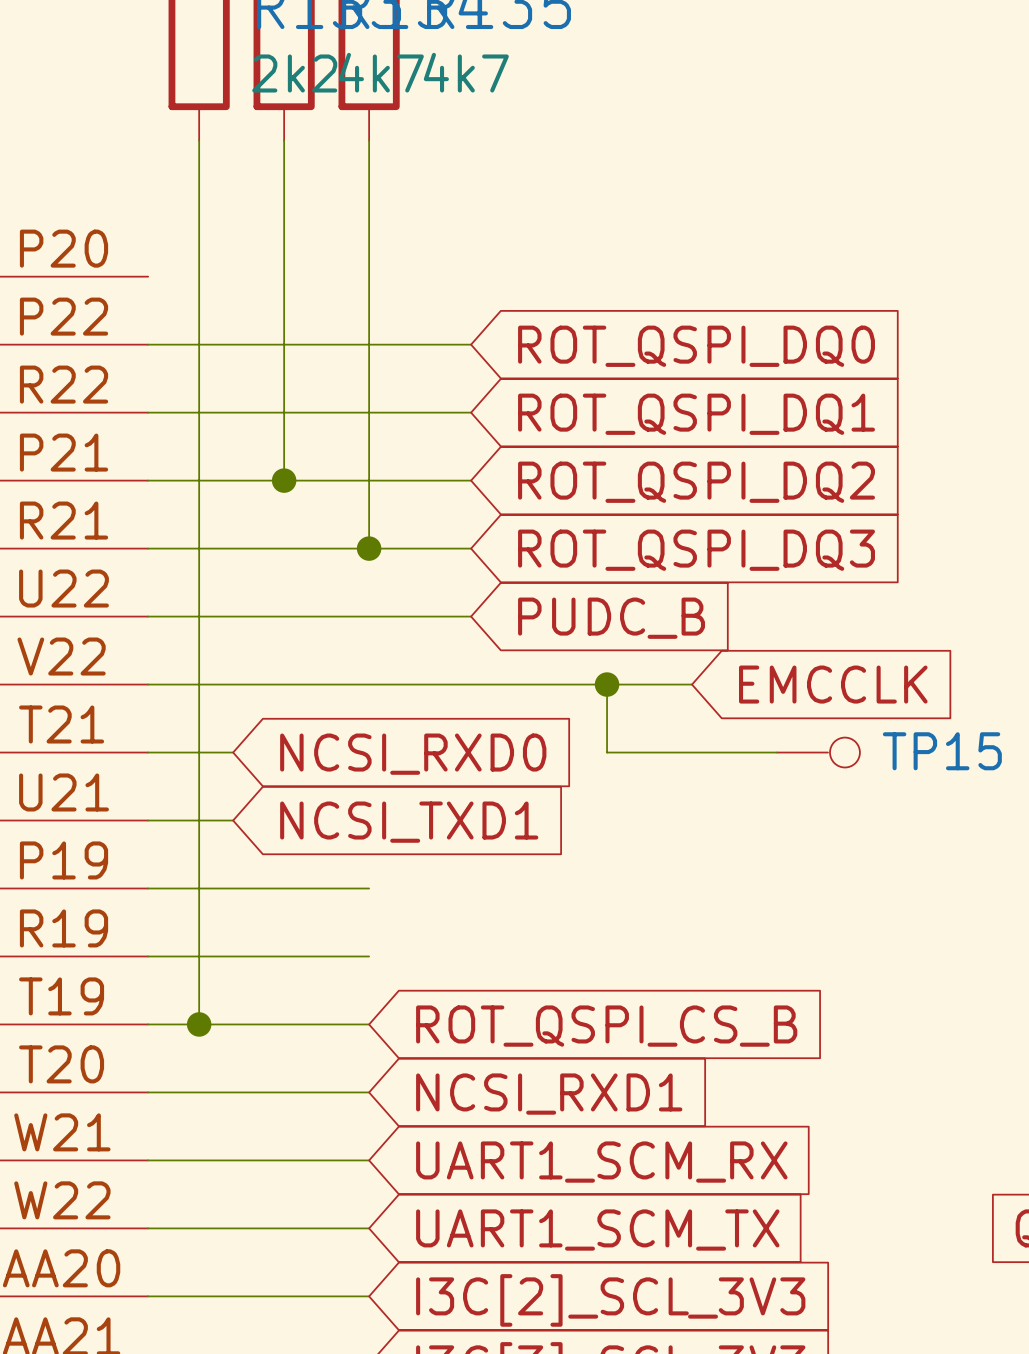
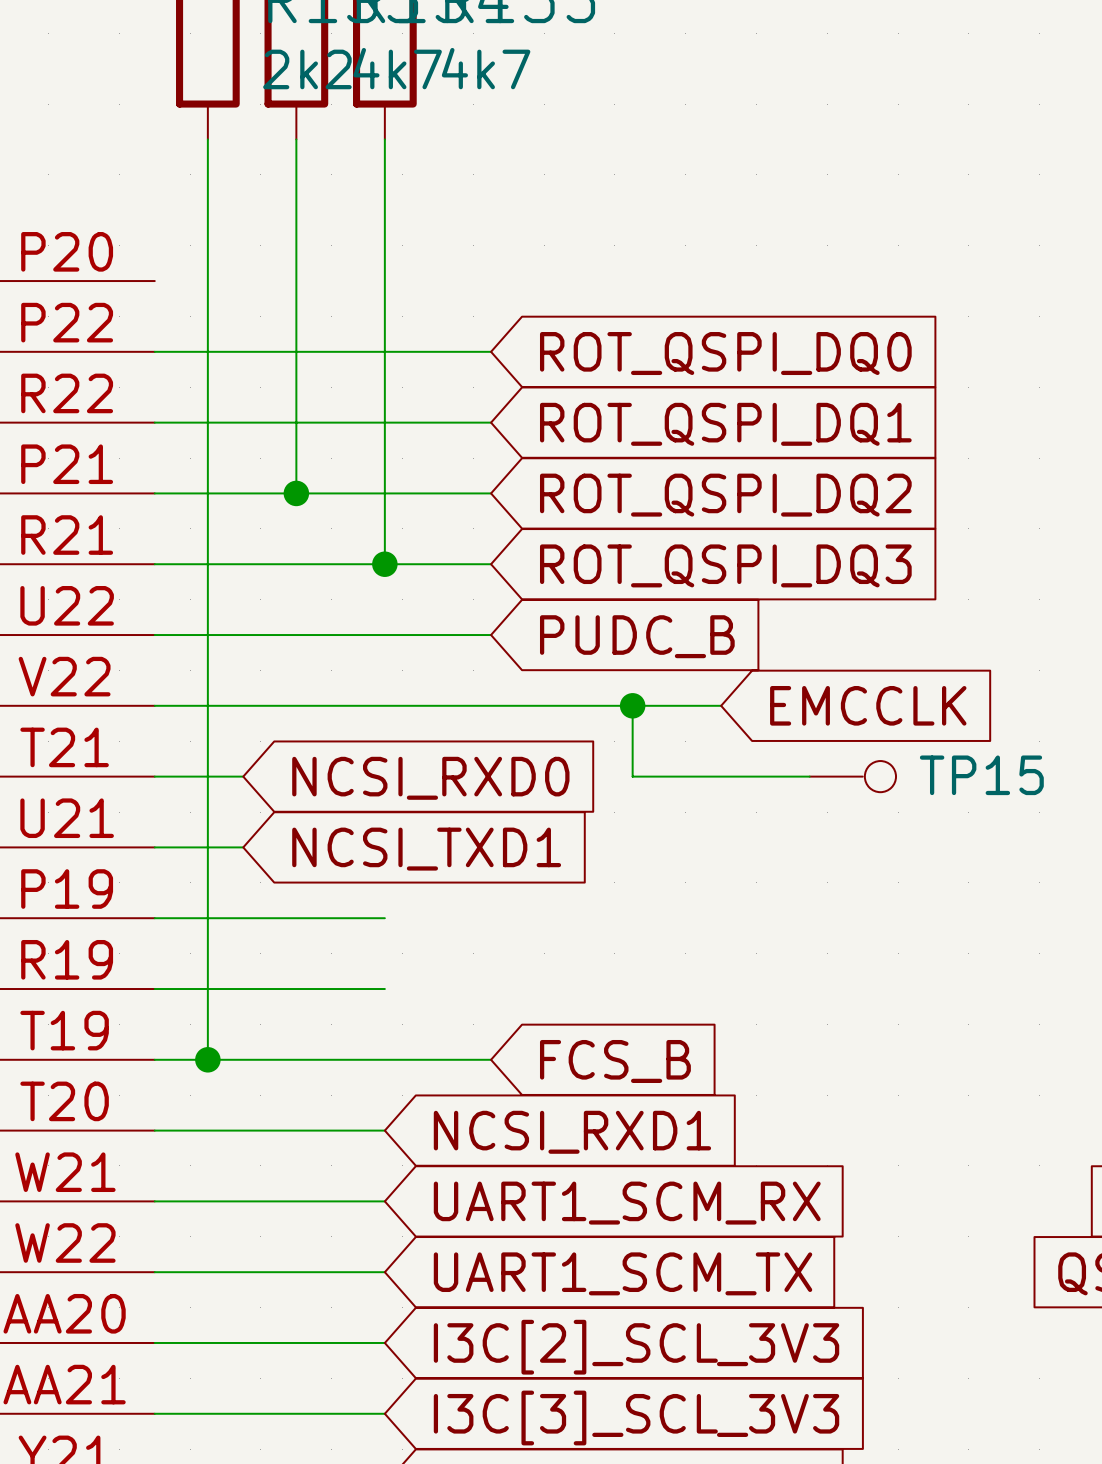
wire: none -> (384, 1059) (491, 1059)
global label: none -> FCS_B (615, 1061)
global label: ROT_QSPI_CS_B (606, 1026) -> none

